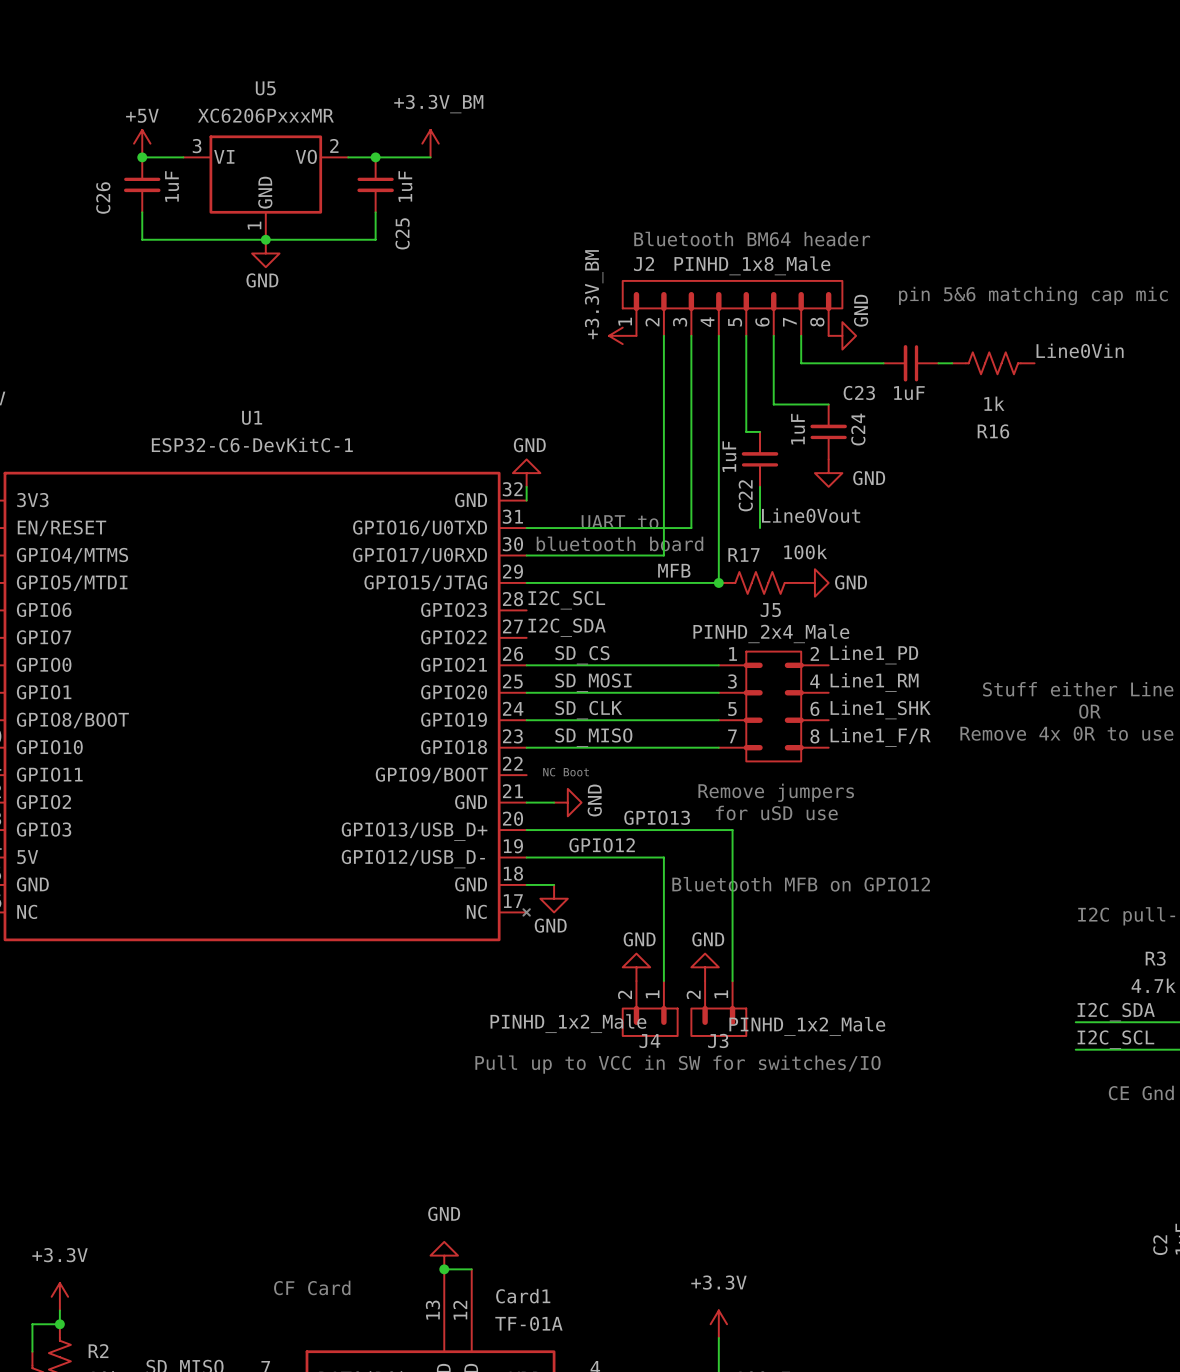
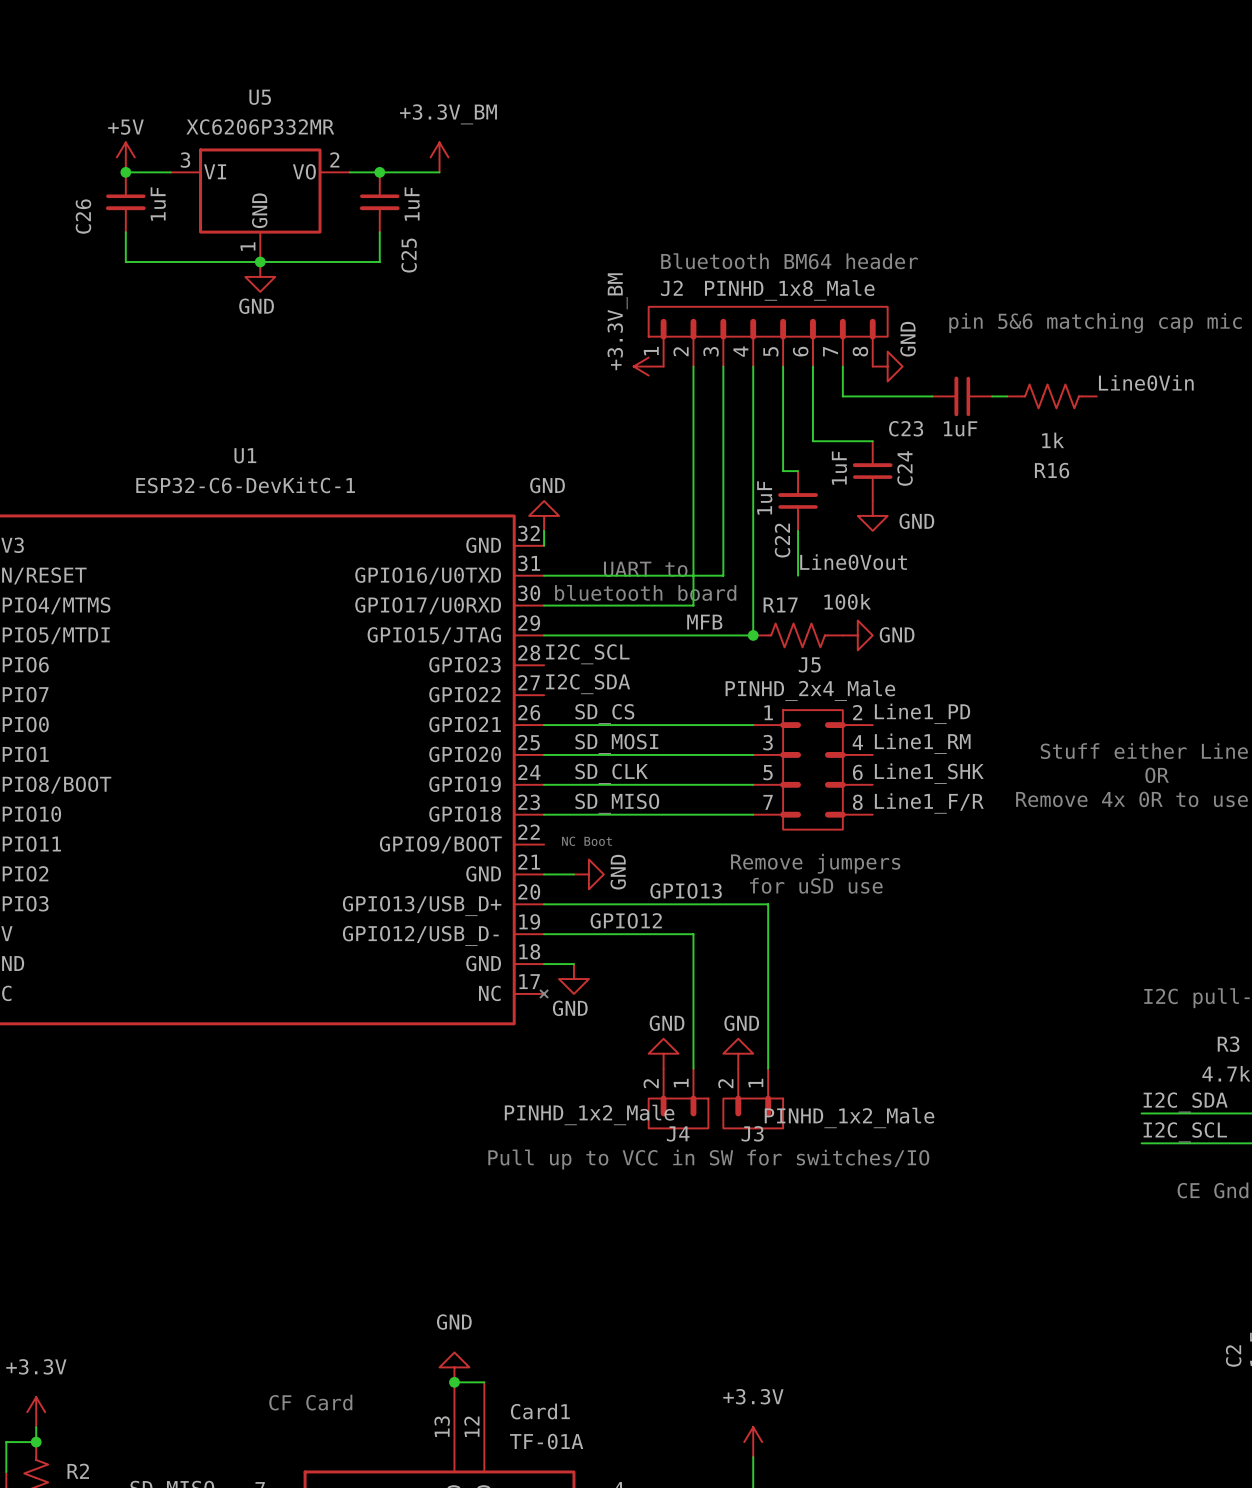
U5 value: XC6206PxxxMR (265, 115) -> XC6206P332MR (260, 126)
text: Bluetooth MFB on GPIO12 (801, 884) -> none

